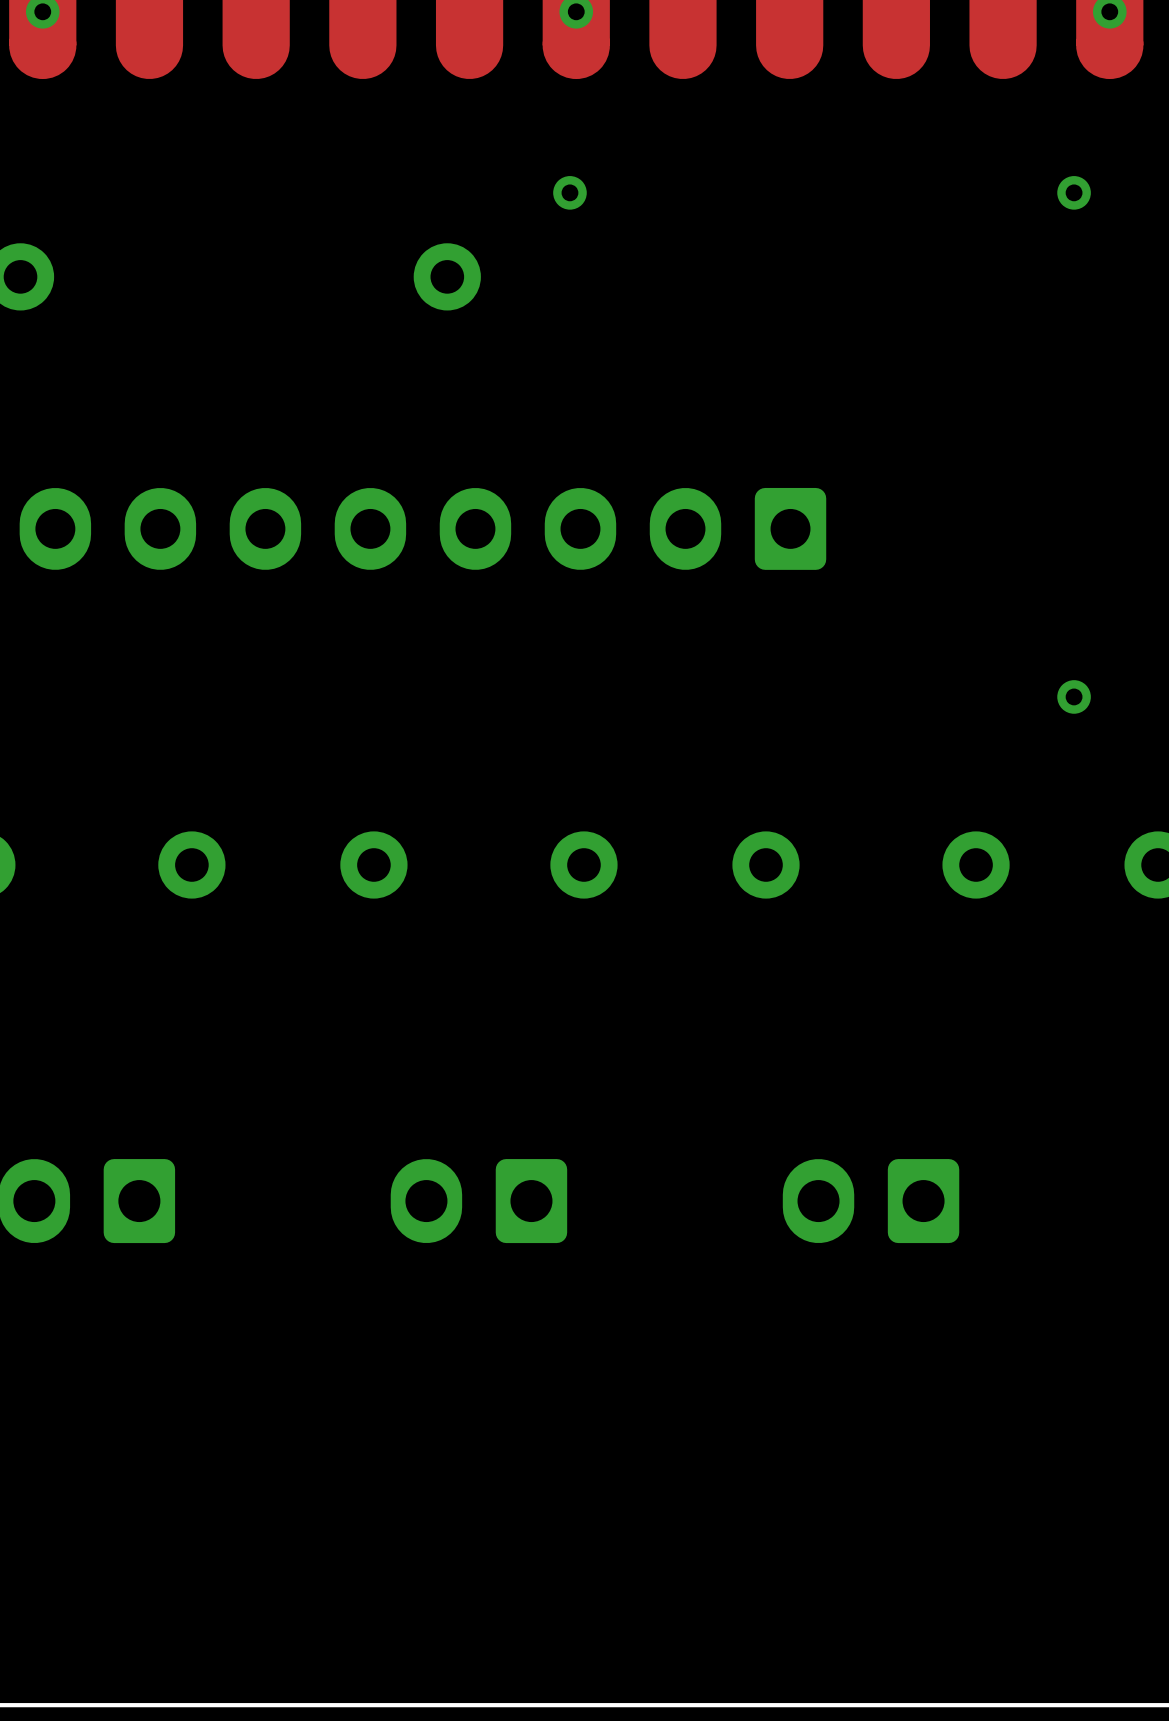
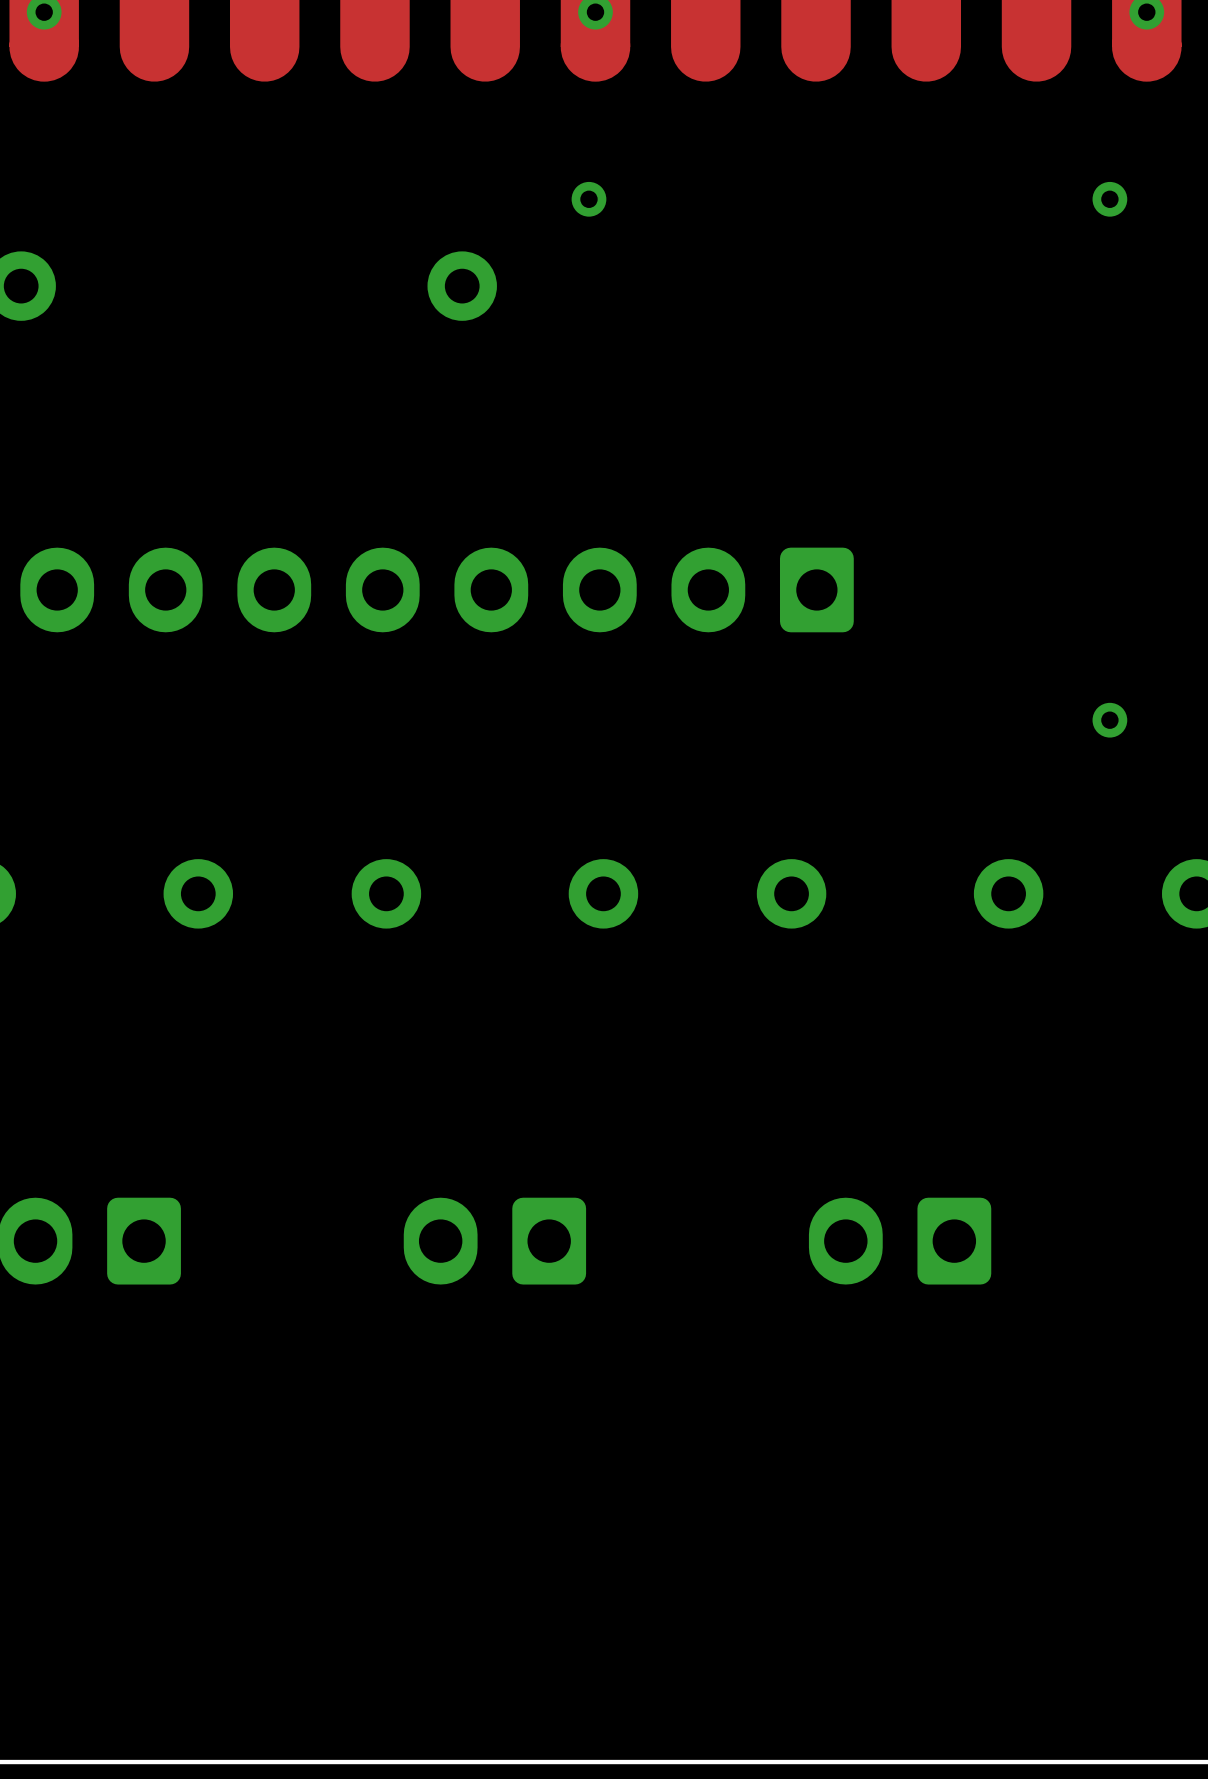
part position: (422, 528) -> (437, 589)

